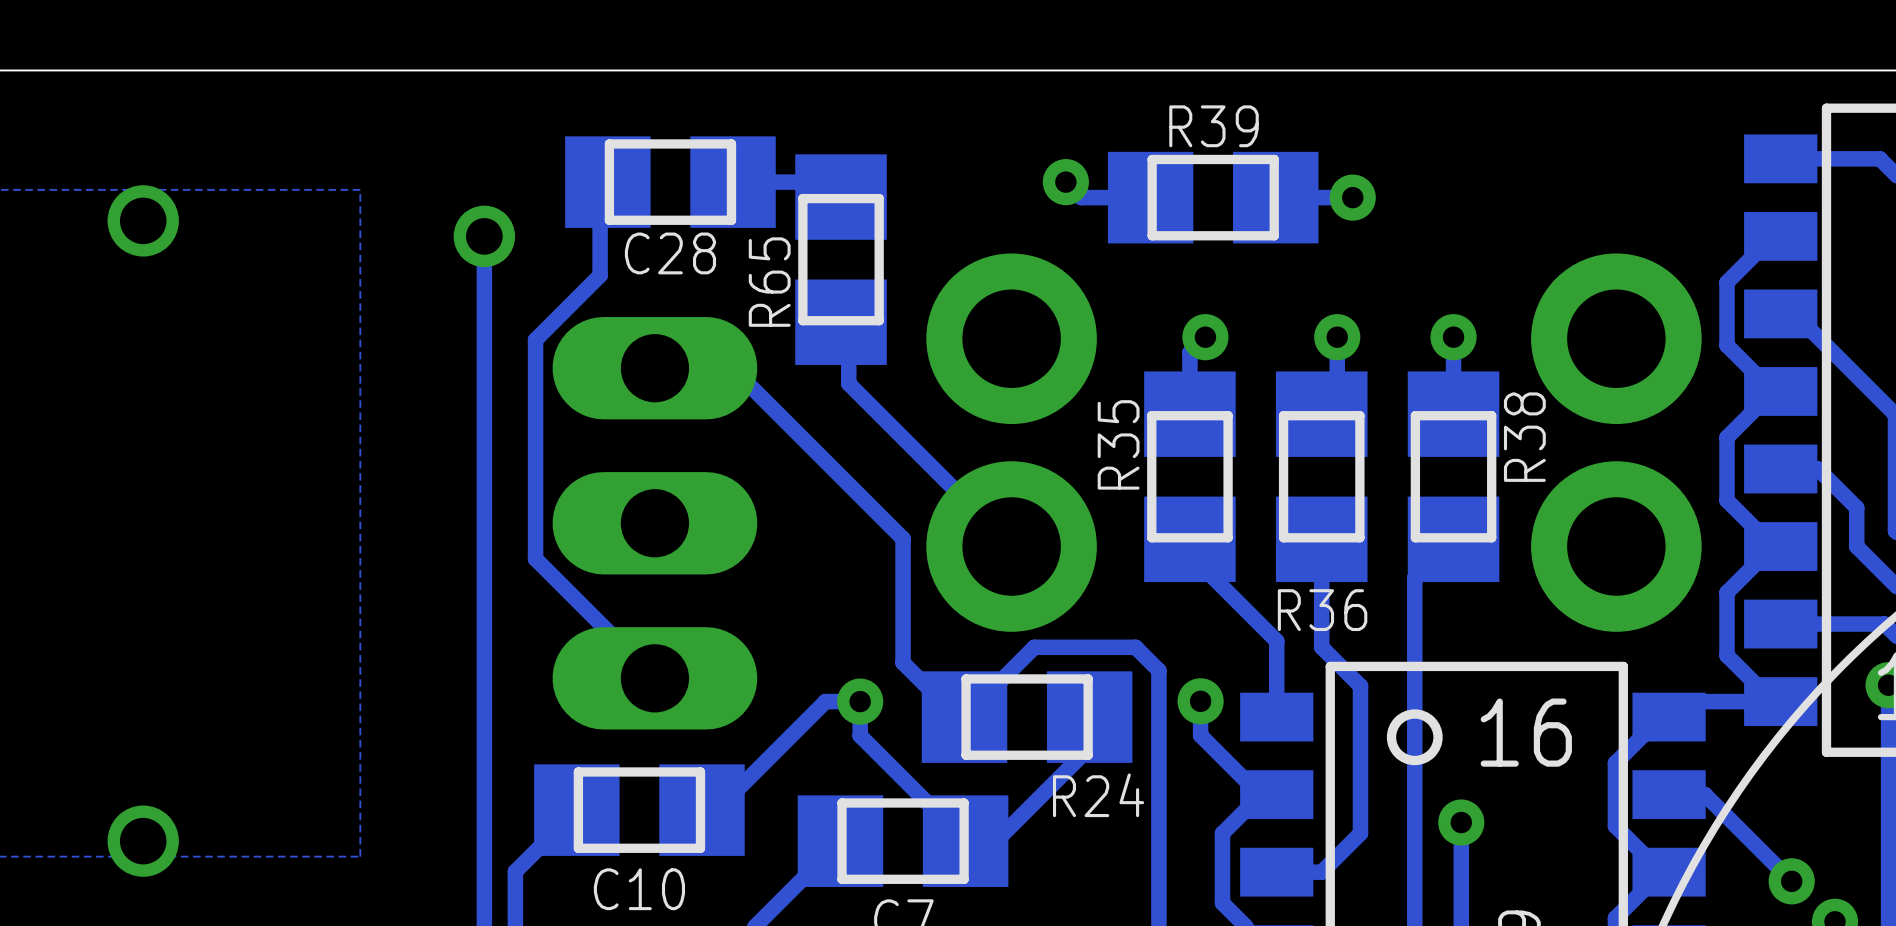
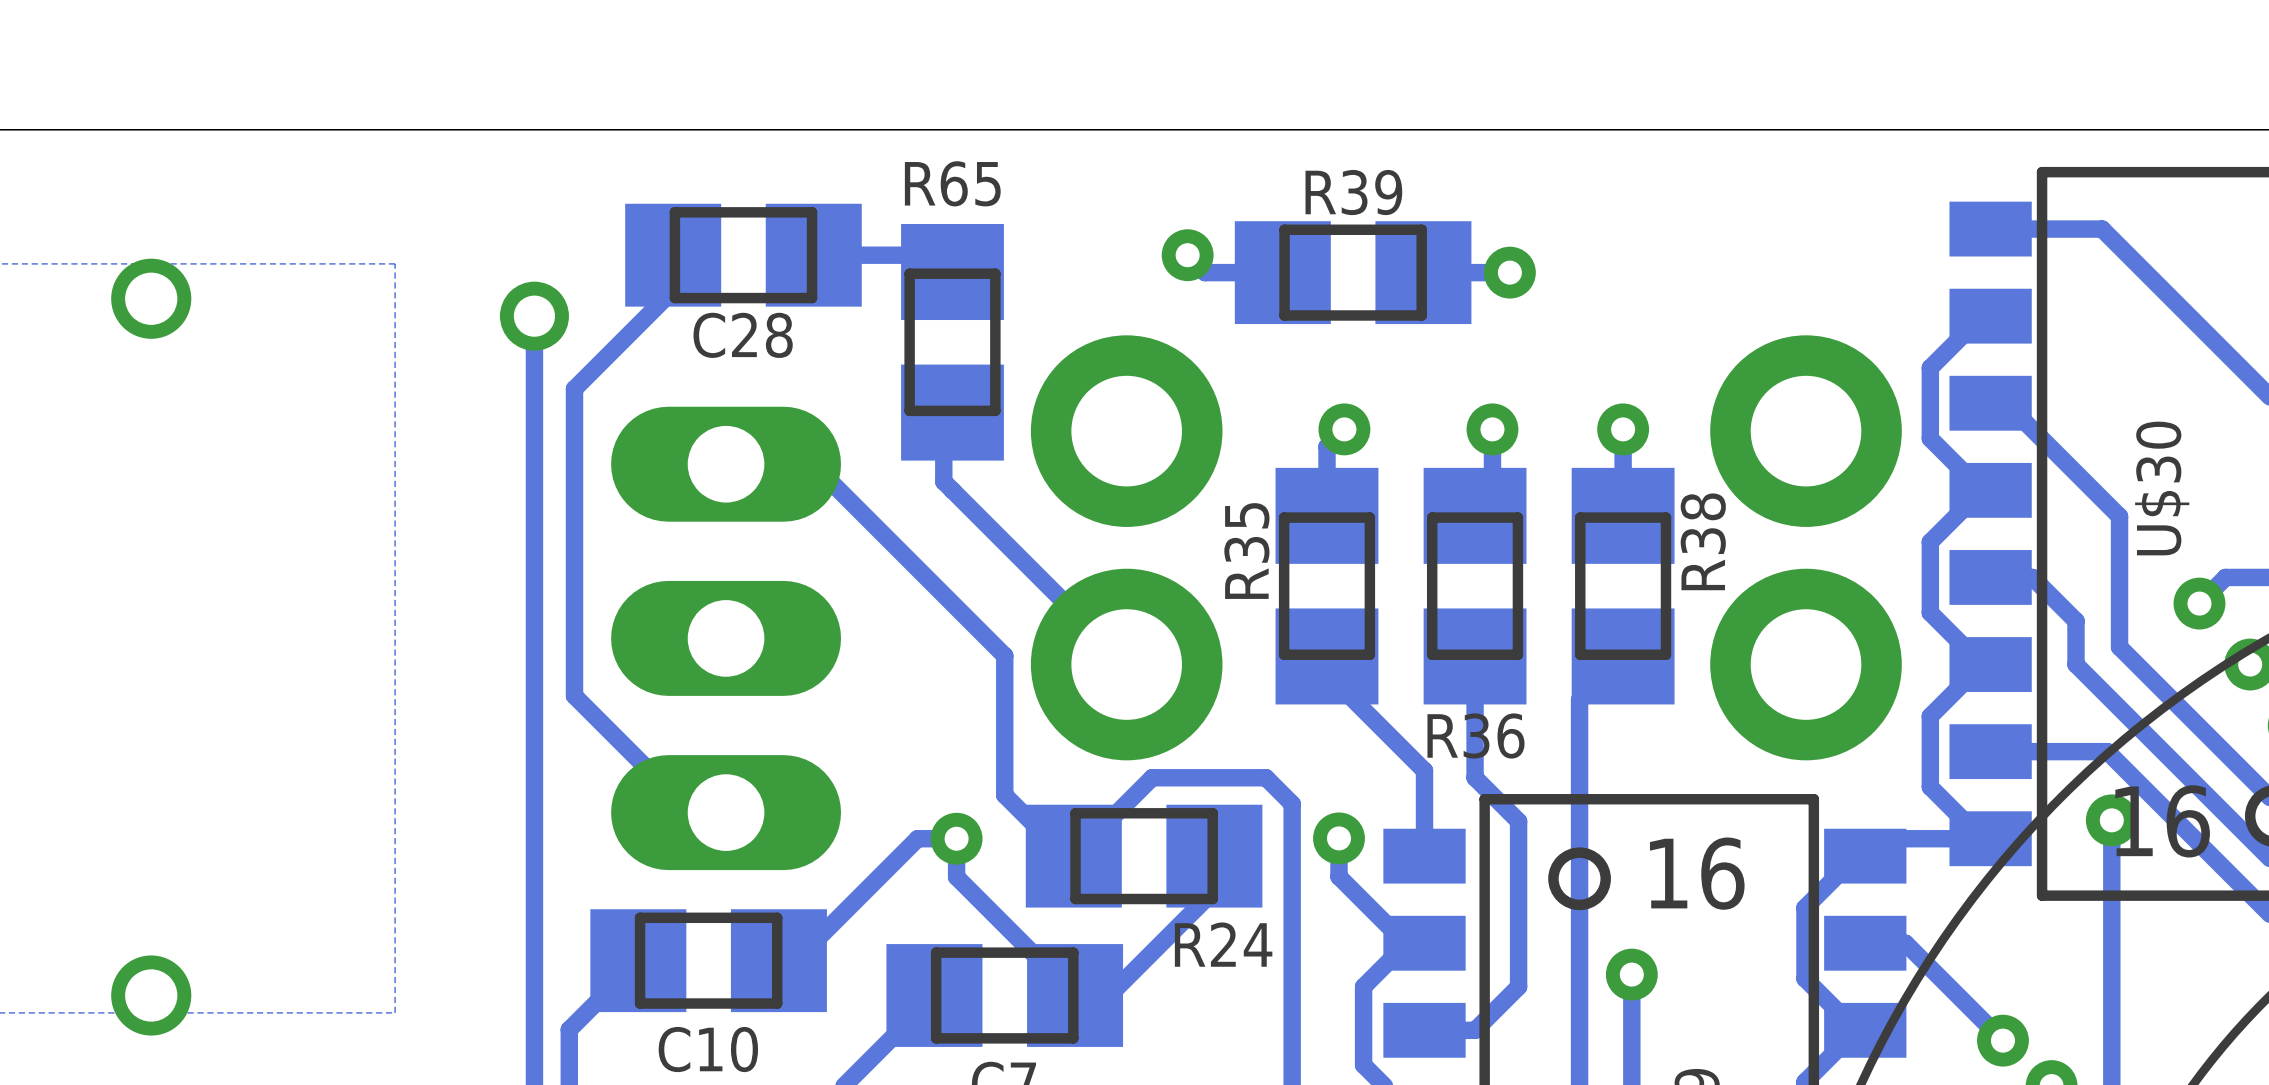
track: (600, 221) (600, 275) (535, 339) (535, 558) (654, 678) -> (664, 298) (574, 388) (574, 695) (691, 812) (726, 812)
R65 position: (841, 259) -> (952, 342)
R65 name rotation: 0° (769, 282) -> 90° clockwise (952, 183)
R65 name position: R65 (769, 282) -> R65 (952, 183)

